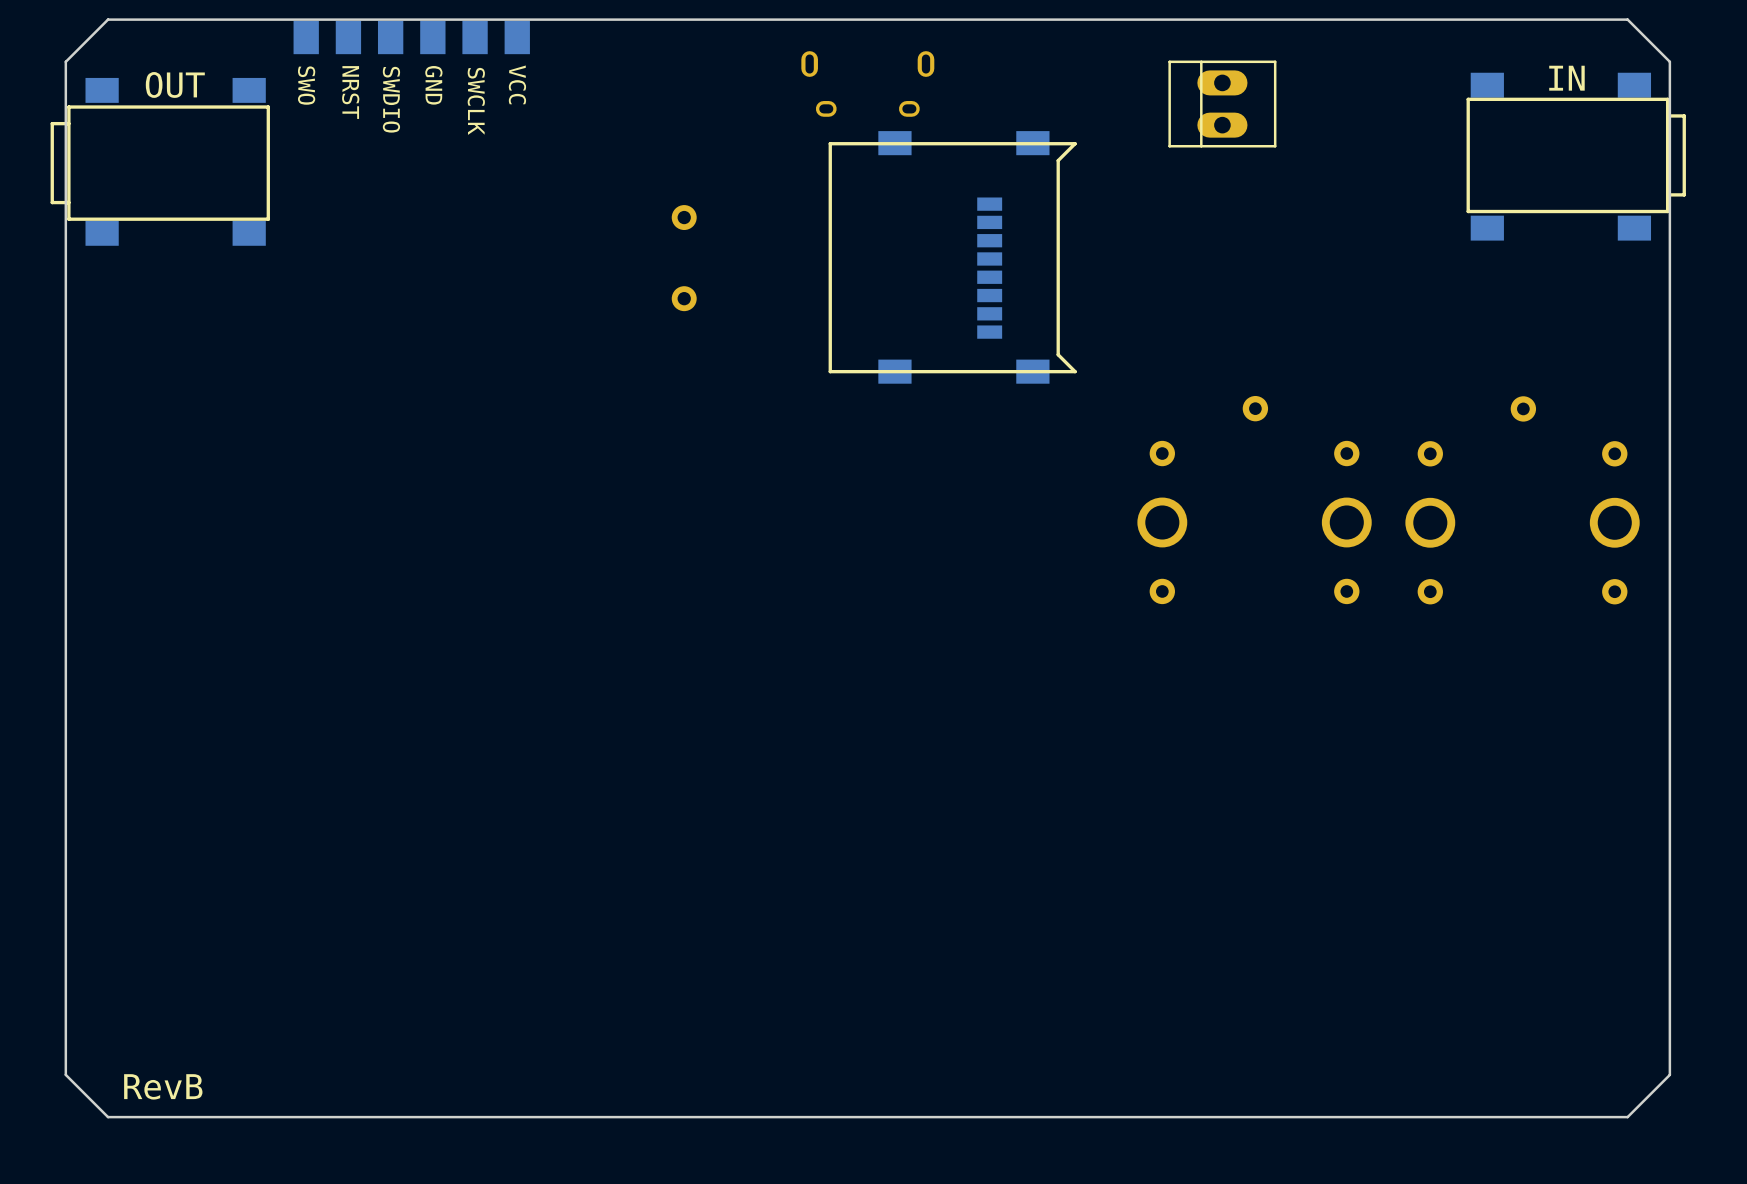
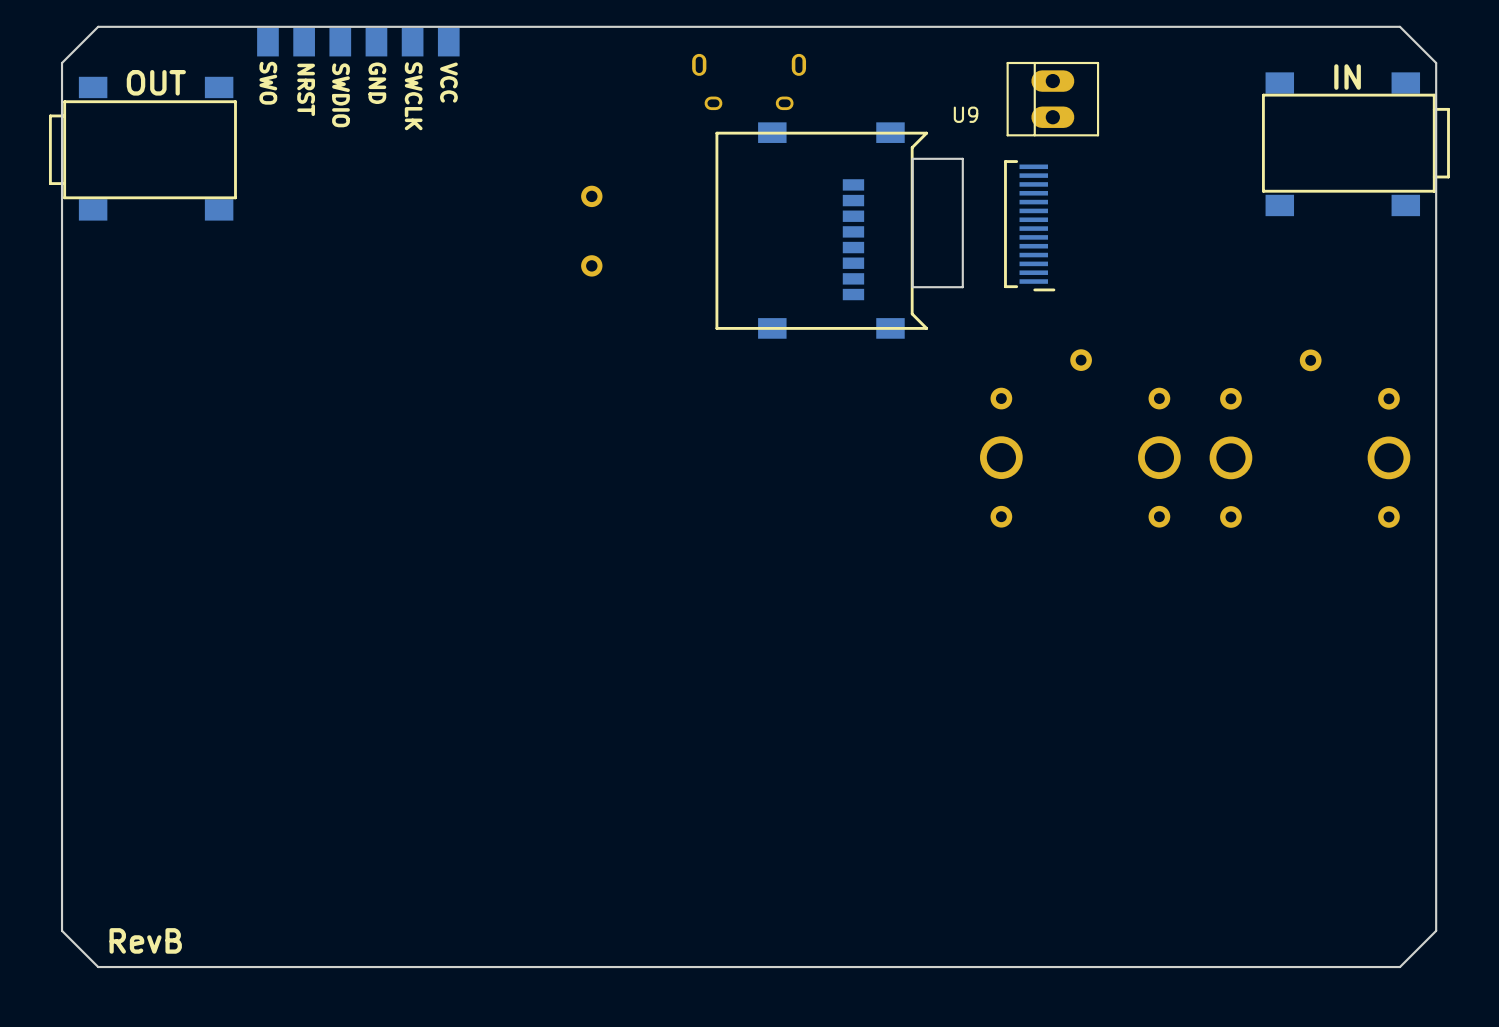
board edge: none -> (912, 158) (912, 286)
board edge: none -> (912, 158) (962, 158) (962, 287) (912, 287)
U9: none -> (1029, 225)

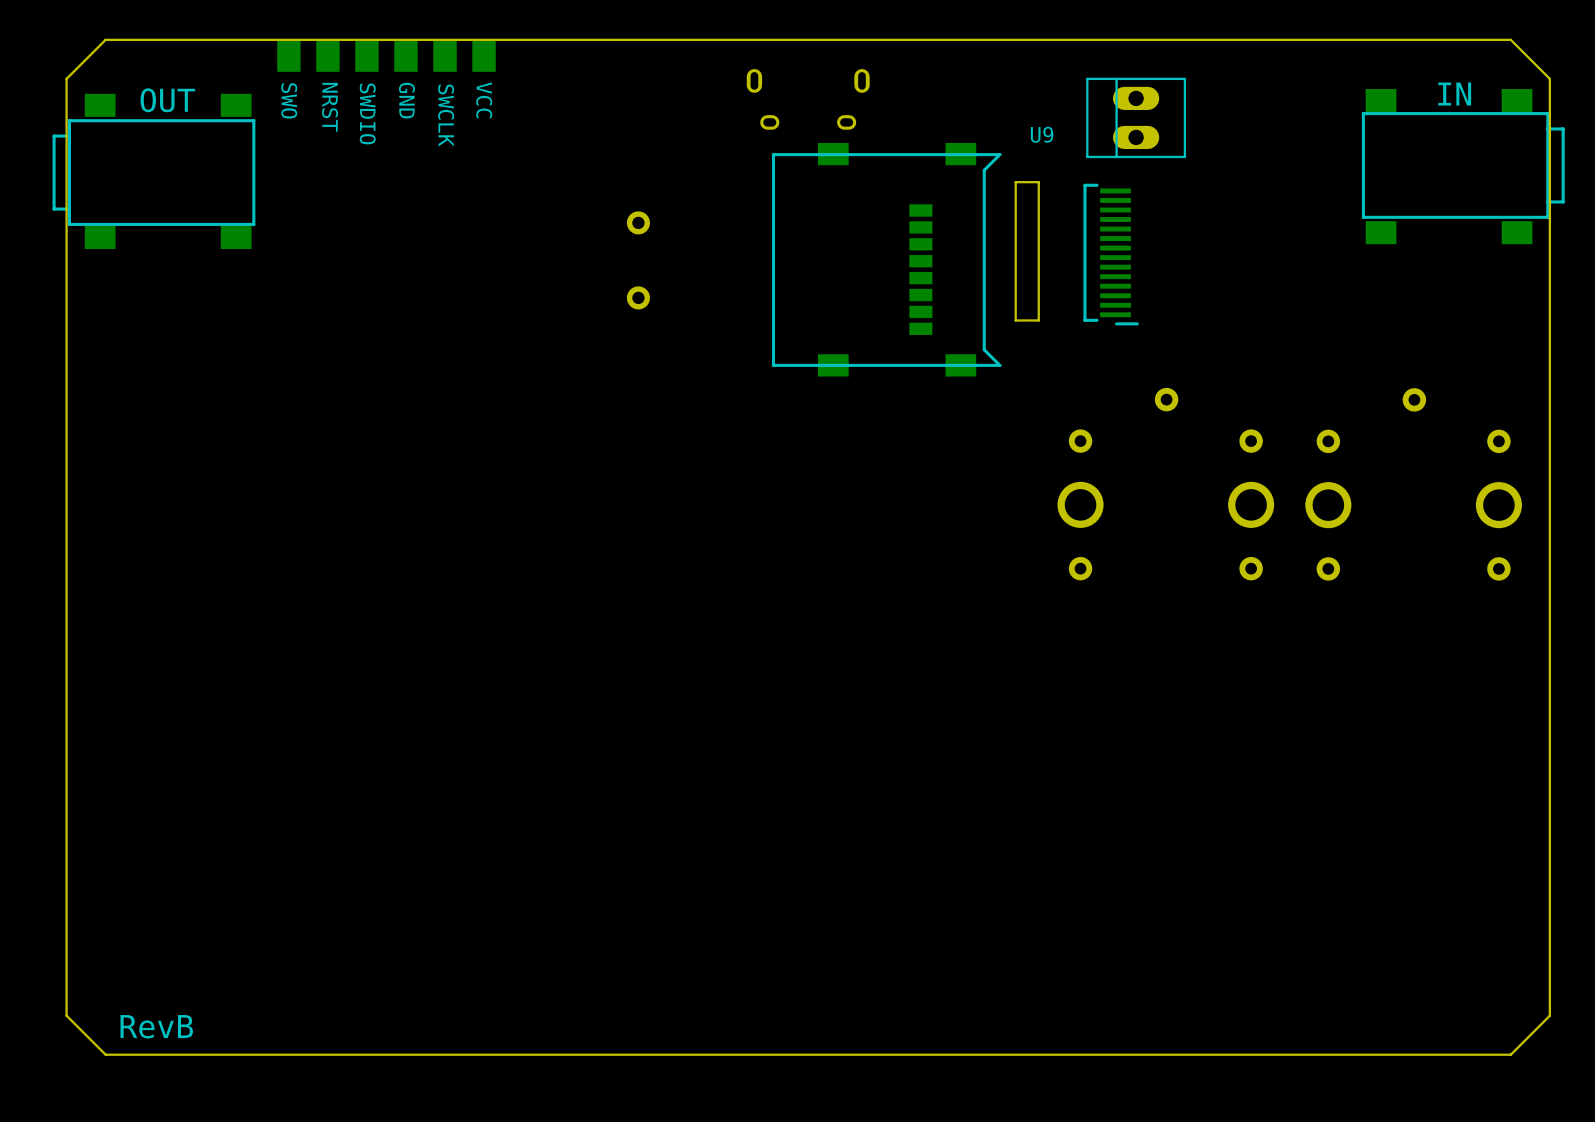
board edge: (912, 158) (962, 158) (962, 287) (912, 287) -> none
board edge: (912, 158) (912, 286) -> none
board edge: none -> (1038, 182) (1038, 320) (1015, 320) (1015, 182) (1038, 182)

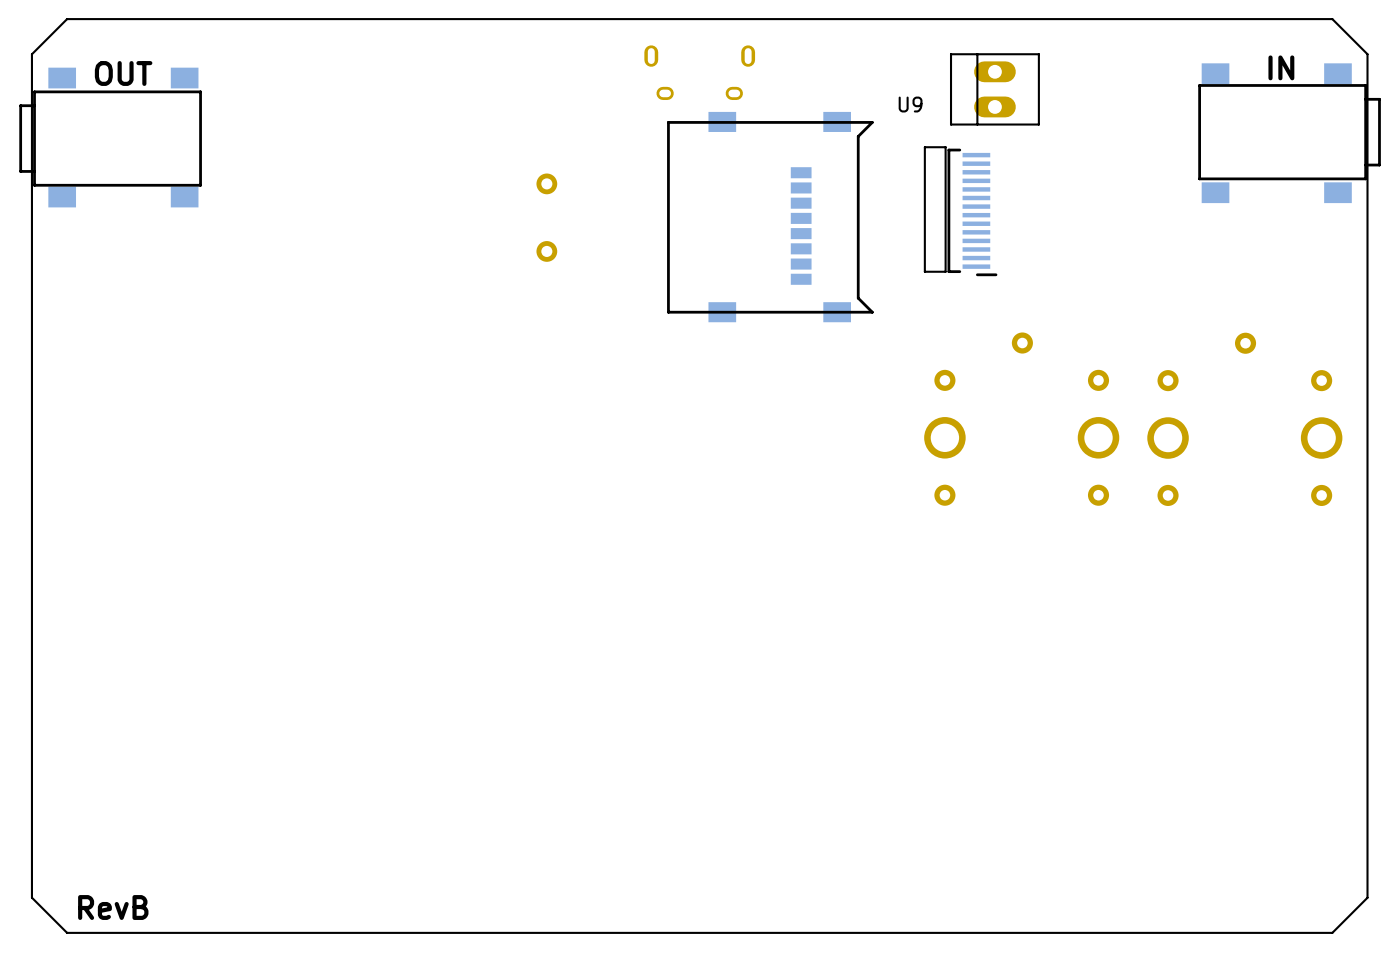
part: (386, 56) -> none
text: SWO (289, 100) -> none
text: GND (406, 100) -> none
text: VCC (484, 100) -> none
text: NRST (330, 107) -> none
text: SWDIO (367, 113) -> none
text: SWCLK (446, 115) -> none
board edge: (1038, 182) (1038, 320) (1015, 320) (1015, 182) (1038, 182) -> (945, 147) (945, 271) (924, 271) (924, 147) (945, 147)

